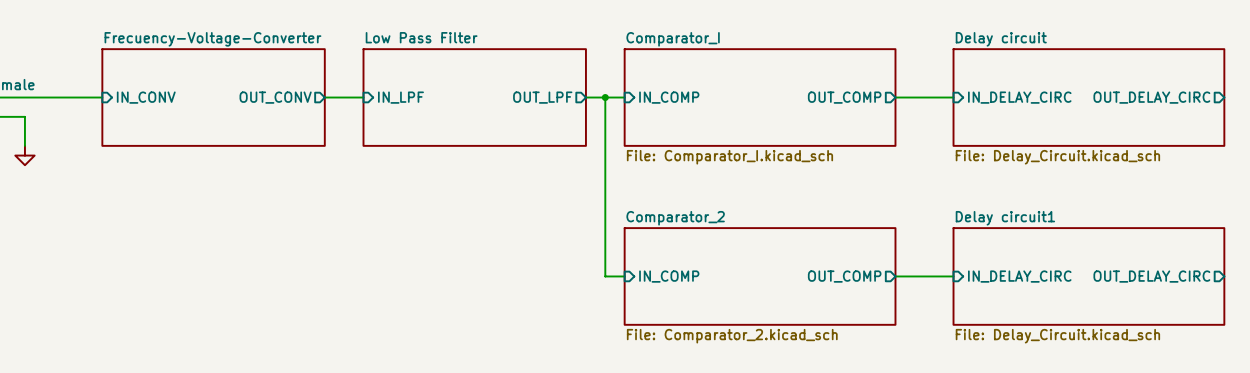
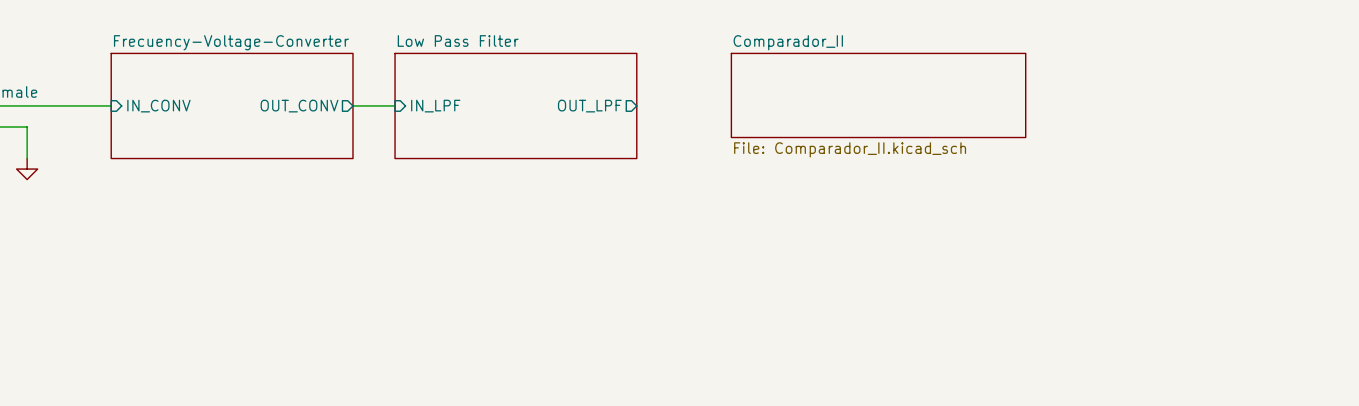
sheet Comparador_II: none -> File: Comparador_II.kicad_sch (878, 95)
wire: (585, 97) (624, 97) -> none
wire: (605, 97) (605, 276) (624, 276) -> none
junction: (605, 97) -> none
sheet pin: IN_COMP (669, 97) -> none
sheet Comparator_I: File: Comparator_I.kicad_sch (760, 97) -> none
sheet pin: OUT_COMP (844, 97) -> none
wire: (895, 97) (953, 97) -> none
sheet pin: IN_DELAY_CIRC (1019, 97) -> none
sheet Delay circuit: File: Delay_Circuit.kicad_sch (1088, 97) -> none
sheet pin: OUT_DELAY_CIRC (1151, 97) -> none
sheet pin: IN_COMP (669, 276) -> none
sheet Comparator_2: File: Comparator_2.kicad_sch (760, 276) -> none
sheet pin: OUT_COMP (844, 276) -> none
wire: (895, 276) (953, 276) -> none
sheet pin: IN_DELAY_CIRC (1019, 276) -> none
sheet Delay circuit1: File: Delay_Circuit.kicad_sch (1088, 276) -> none
sheet pin: OUT_DELAY_CIRC (1151, 276) -> none

